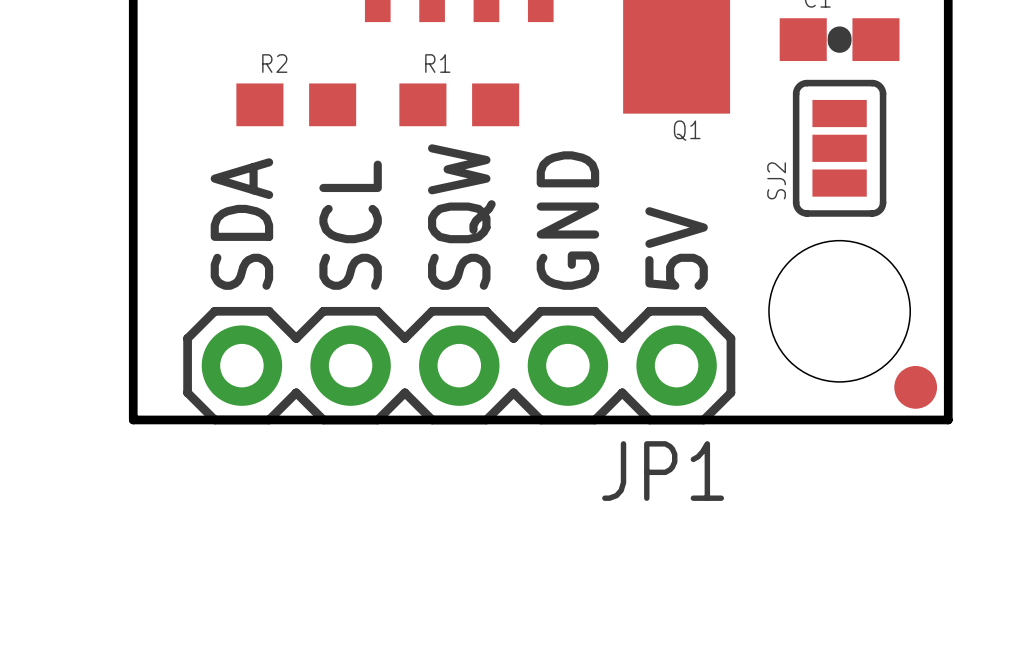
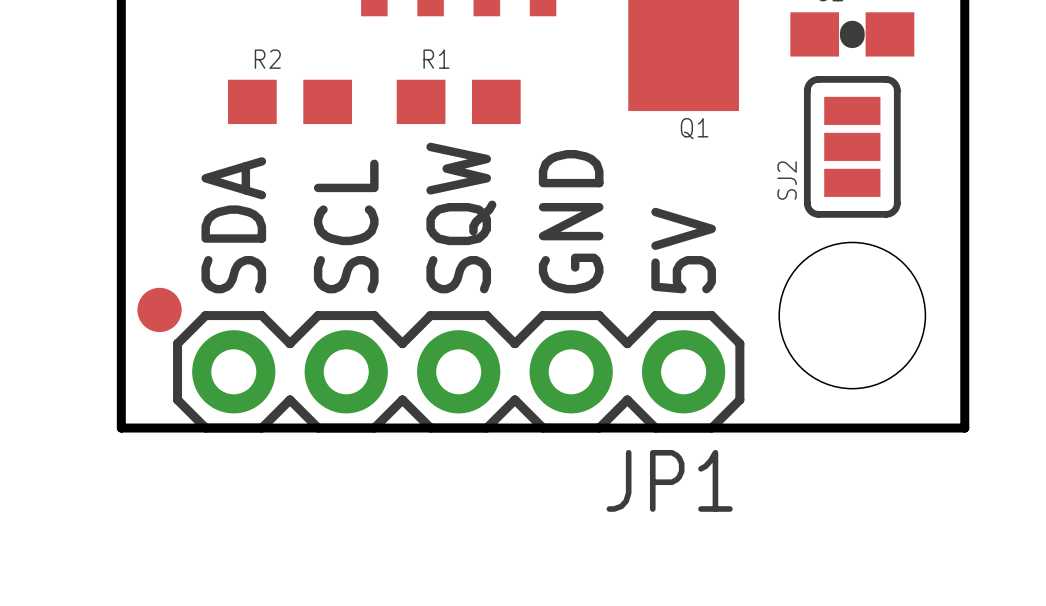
part position: (915, 387) -> (159, 309)

